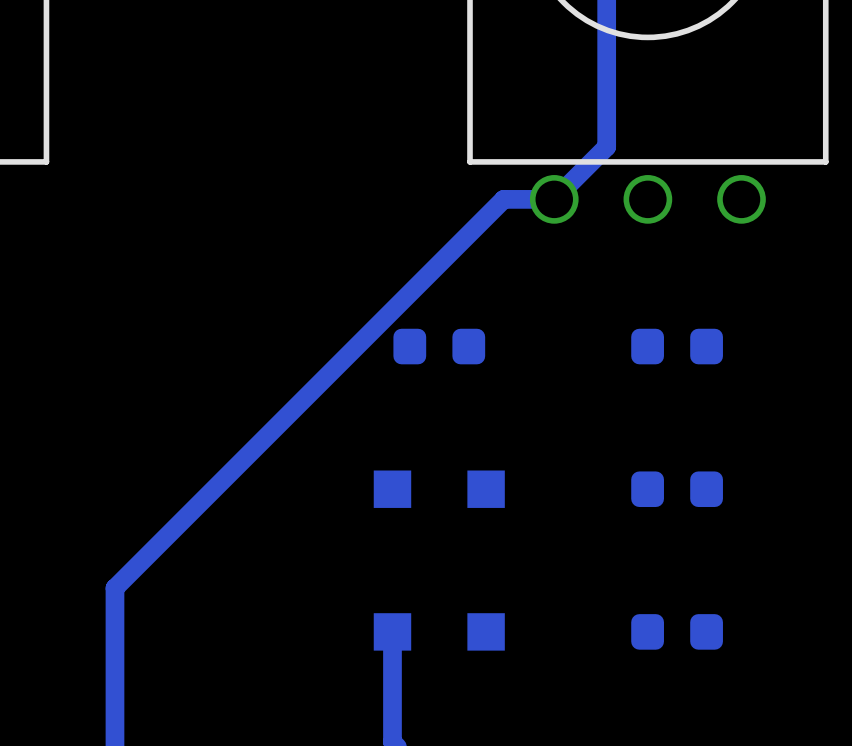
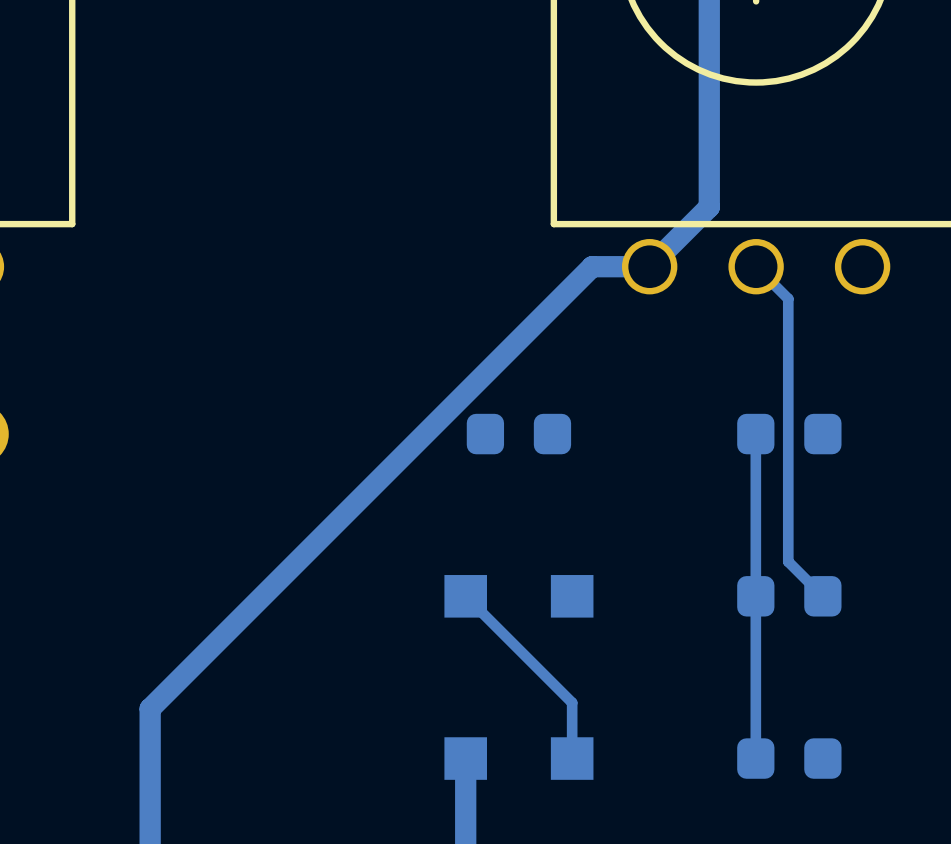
bottom track: none -> (756, 266) (788, 298) (788, 561) (822, 596)
bottom track: none -> (755, 434) (755, 758)
bottom track: none -> (465, 596) (572, 702) (572, 758)

